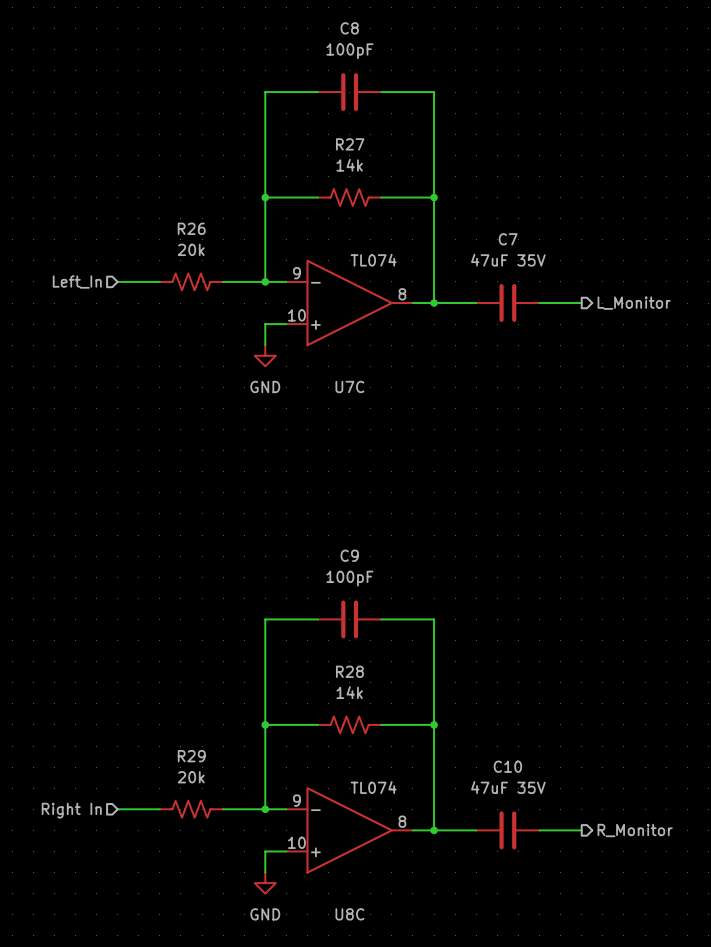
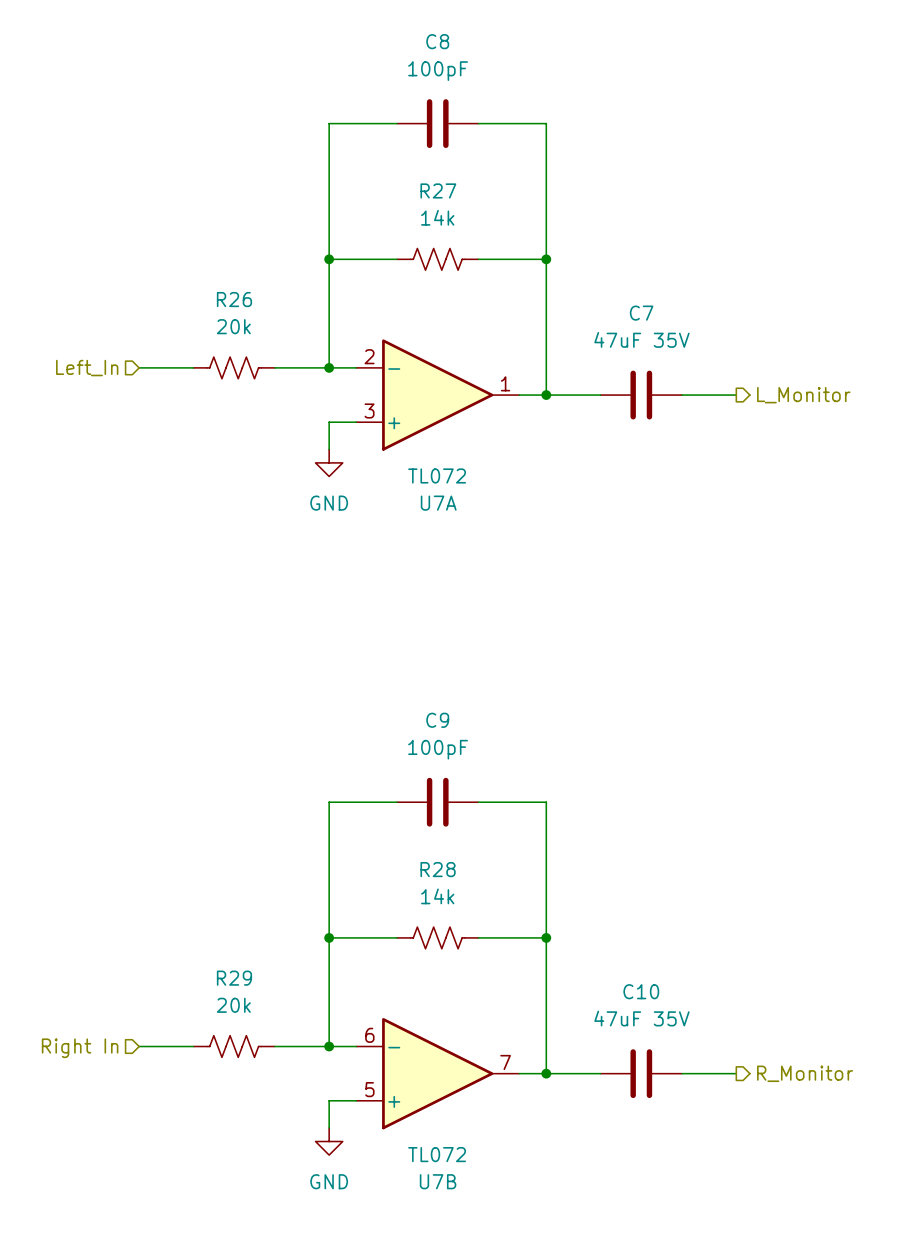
U7C value: TL074 (373, 260) -> TL072 (437, 475)
U7C pin number: 9 (296, 273) -> 2 (369, 356)
U7C pin number: 8 (402, 294) -> 1 (505, 383)
U7C pin number: 10 (296, 315) -> 3 (369, 411)
U7C name: U7C (349, 386) -> U7A (438, 503)
U8C value: TL074 (373, 787) -> TL072 (437, 1154)
U8C pin number: 9 (296, 800) -> 6 (369, 1035)
U8C pin number: 8 (402, 821) -> 7 (505, 1062)
U8C pin number: 10 (296, 842) -> 5 (369, 1089)
U8C name: U8C (349, 914) -> U7B (438, 1181)

